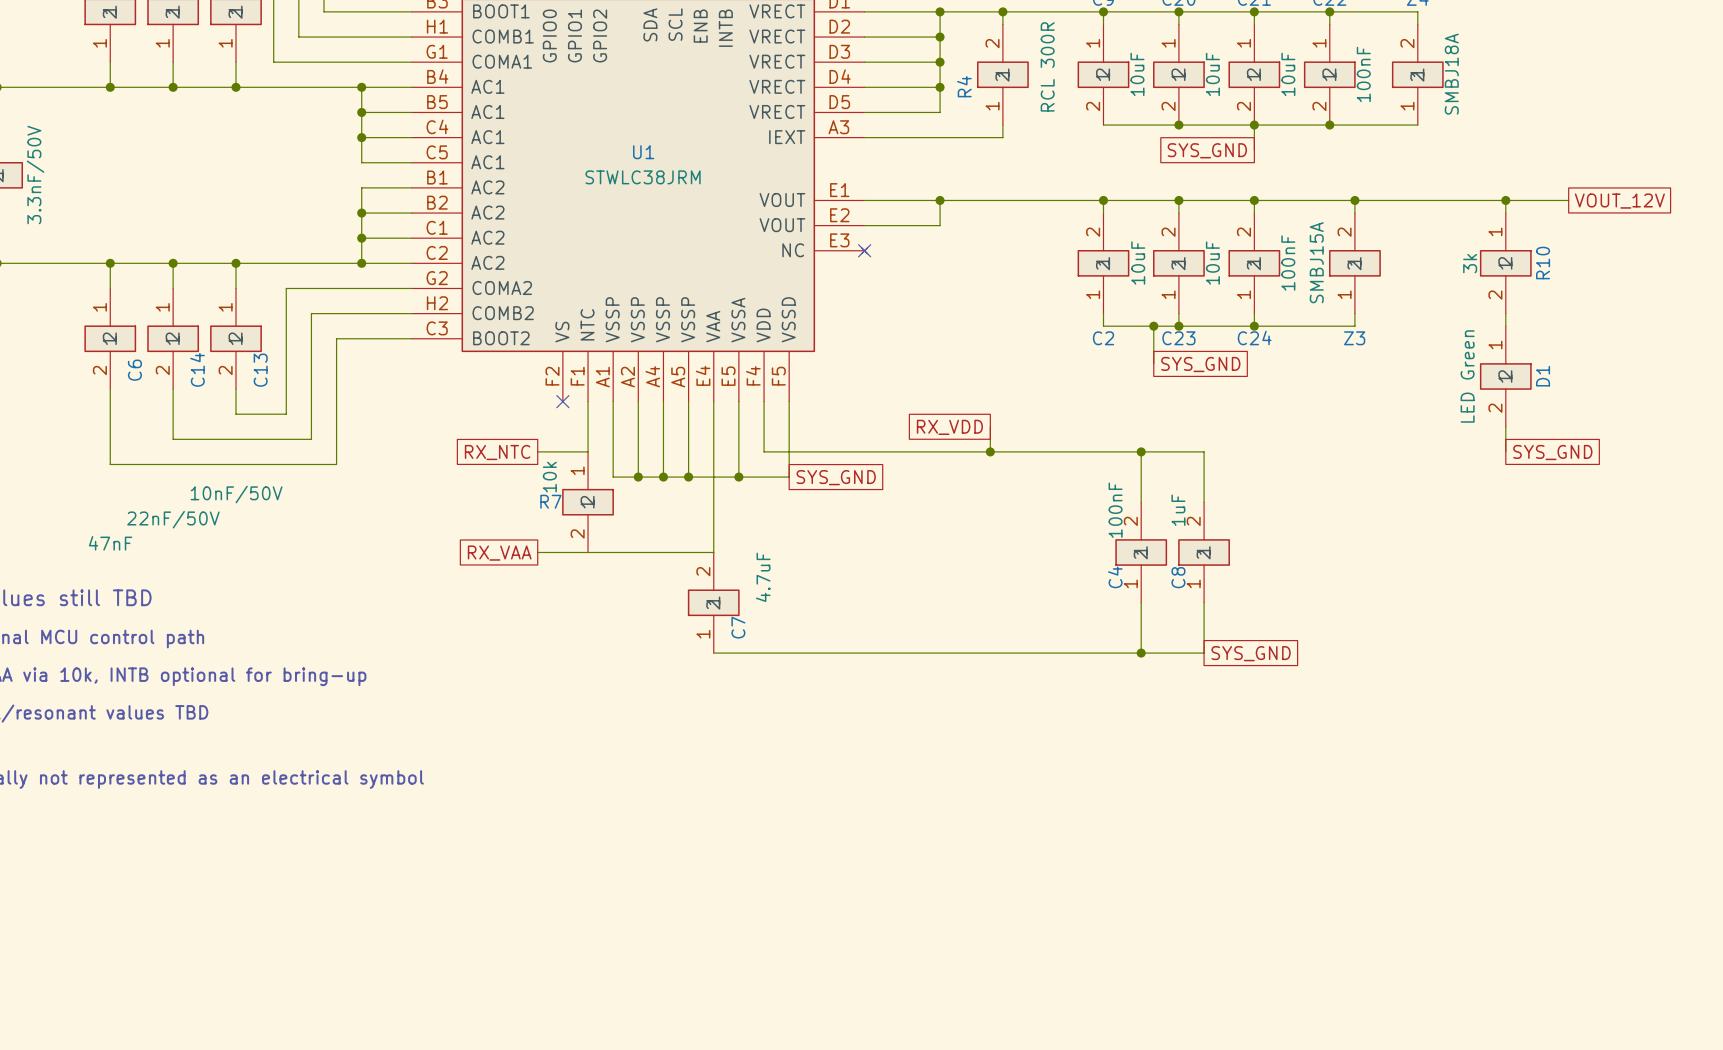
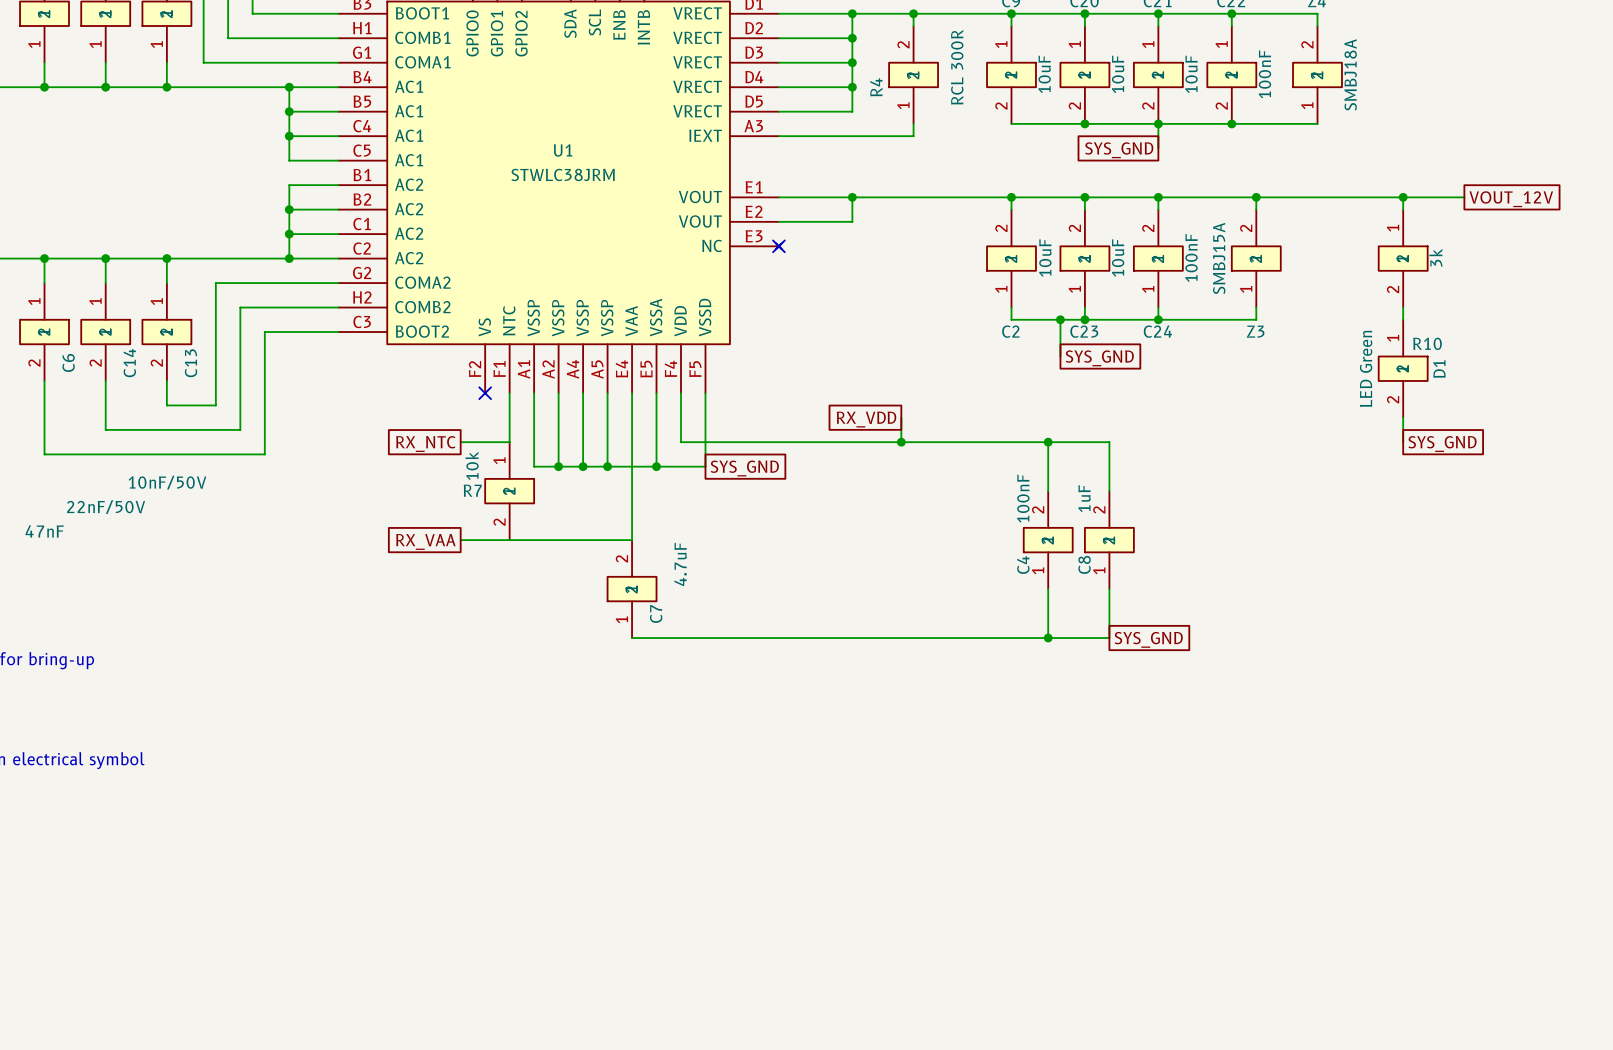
R10 value position: 3k (1470, 263) -> 3k (1435, 257)
R10 name rotation: 0° (1543, 263) -> 90° clockwise (1427, 343)
R10 name position: R10 (1543, 263) -> R10 (1427, 343)

